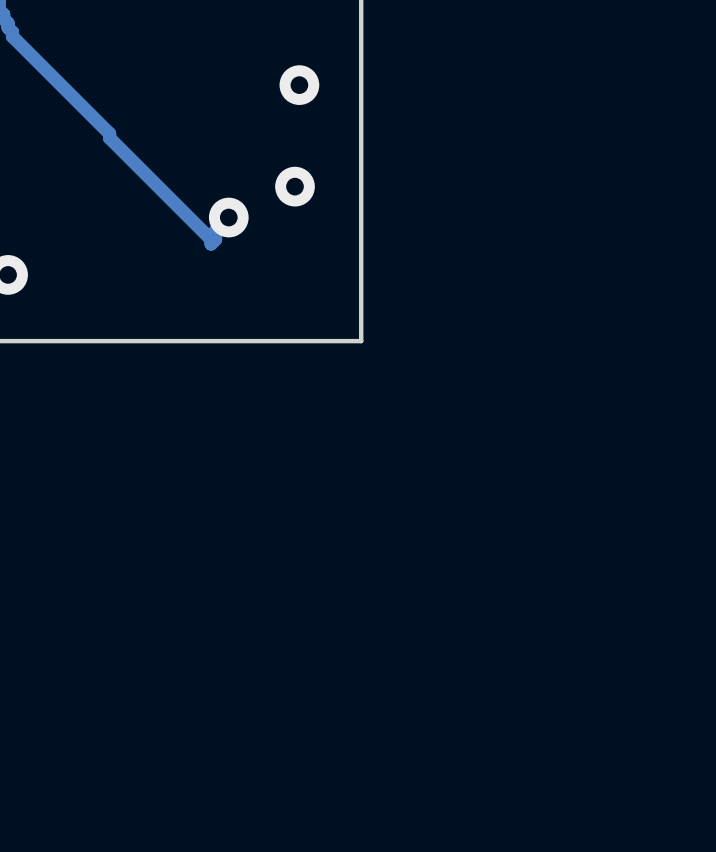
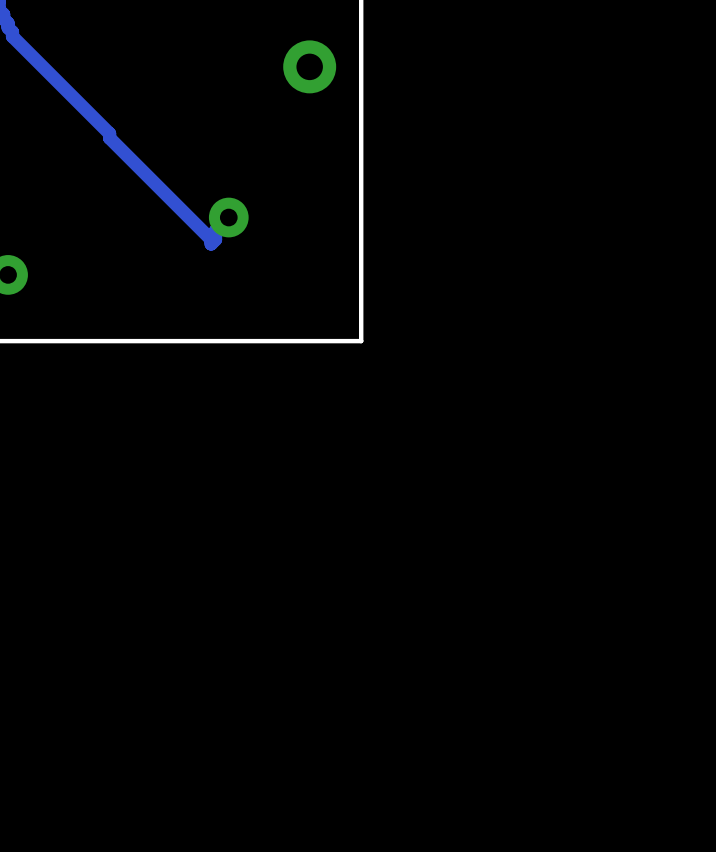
via size: [279, 65, 320, 105] -> [283, 40, 337, 94]
via: (294, 186) -> none

